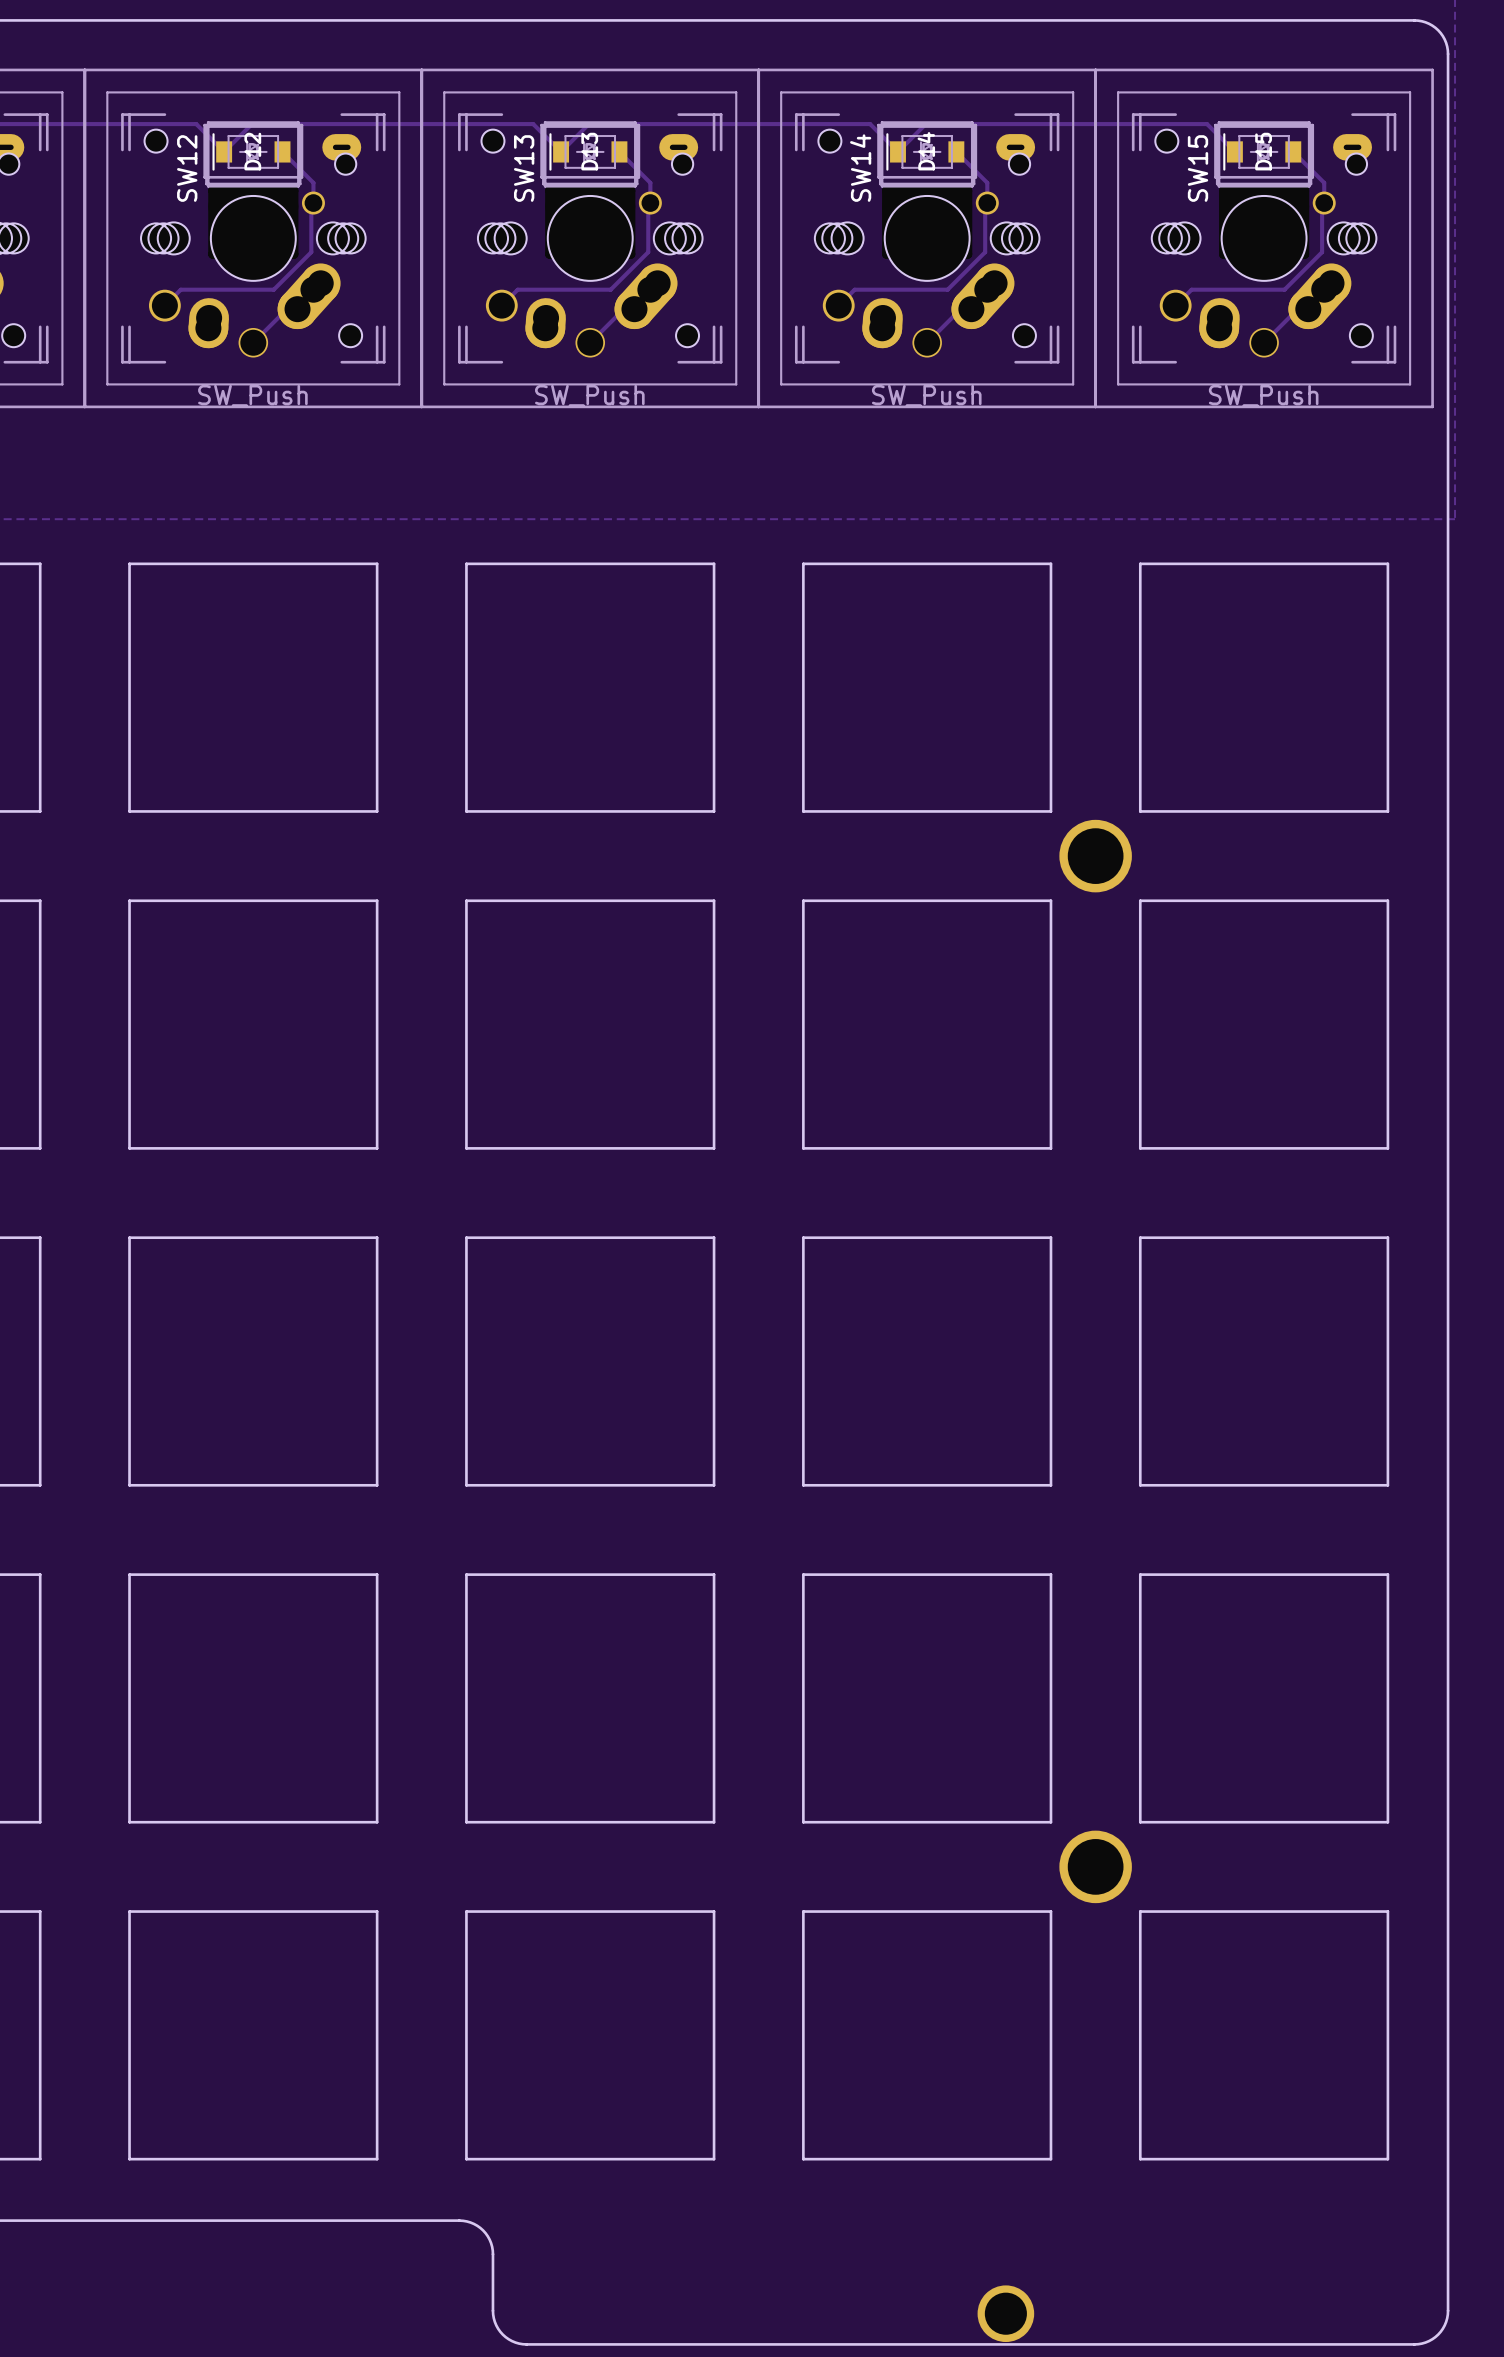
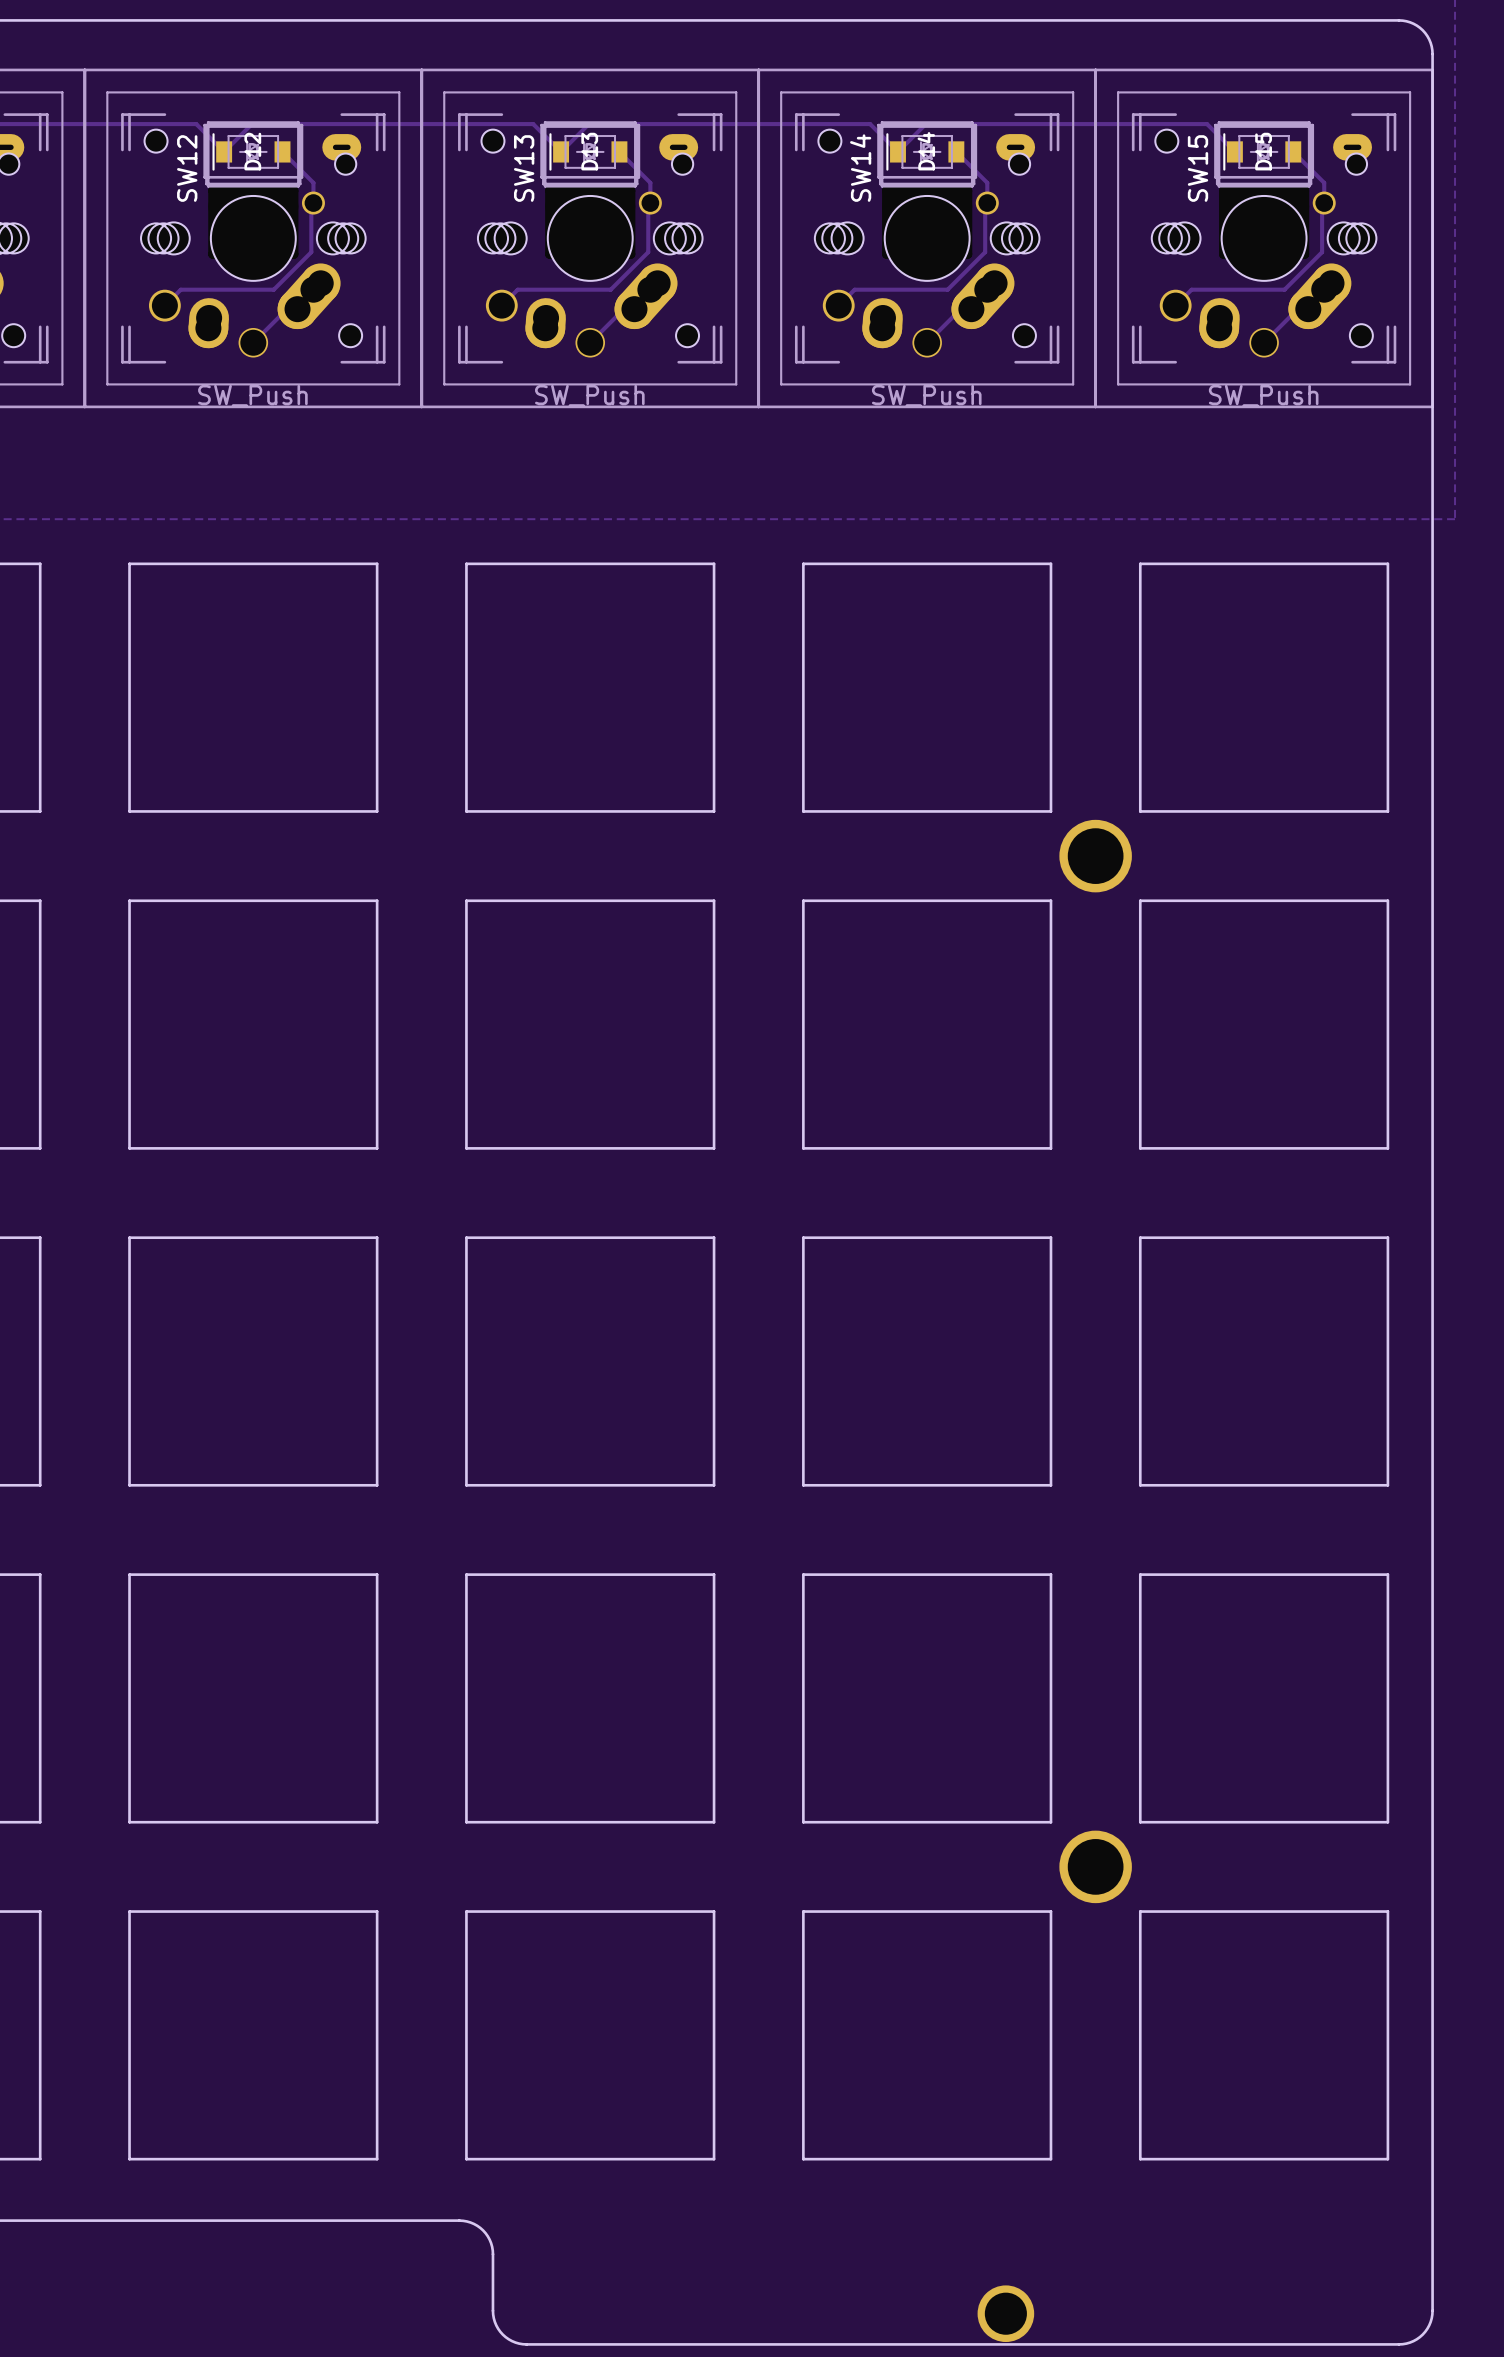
board edge: (1398, 20) (1418, 20) (1432, 25) (1442, 36) (1448, 54) (1448, 2310) (1444, 2325) (1432, 2339) (1418, 2344) (1398, 2344) -> (1398, 20) (1413, 23) (1422, 30) (1429, 39) (1432, 54) (1432, 2310) (1430, 2321) (1422, 2334) (1413, 2341) (1398, 2344)

